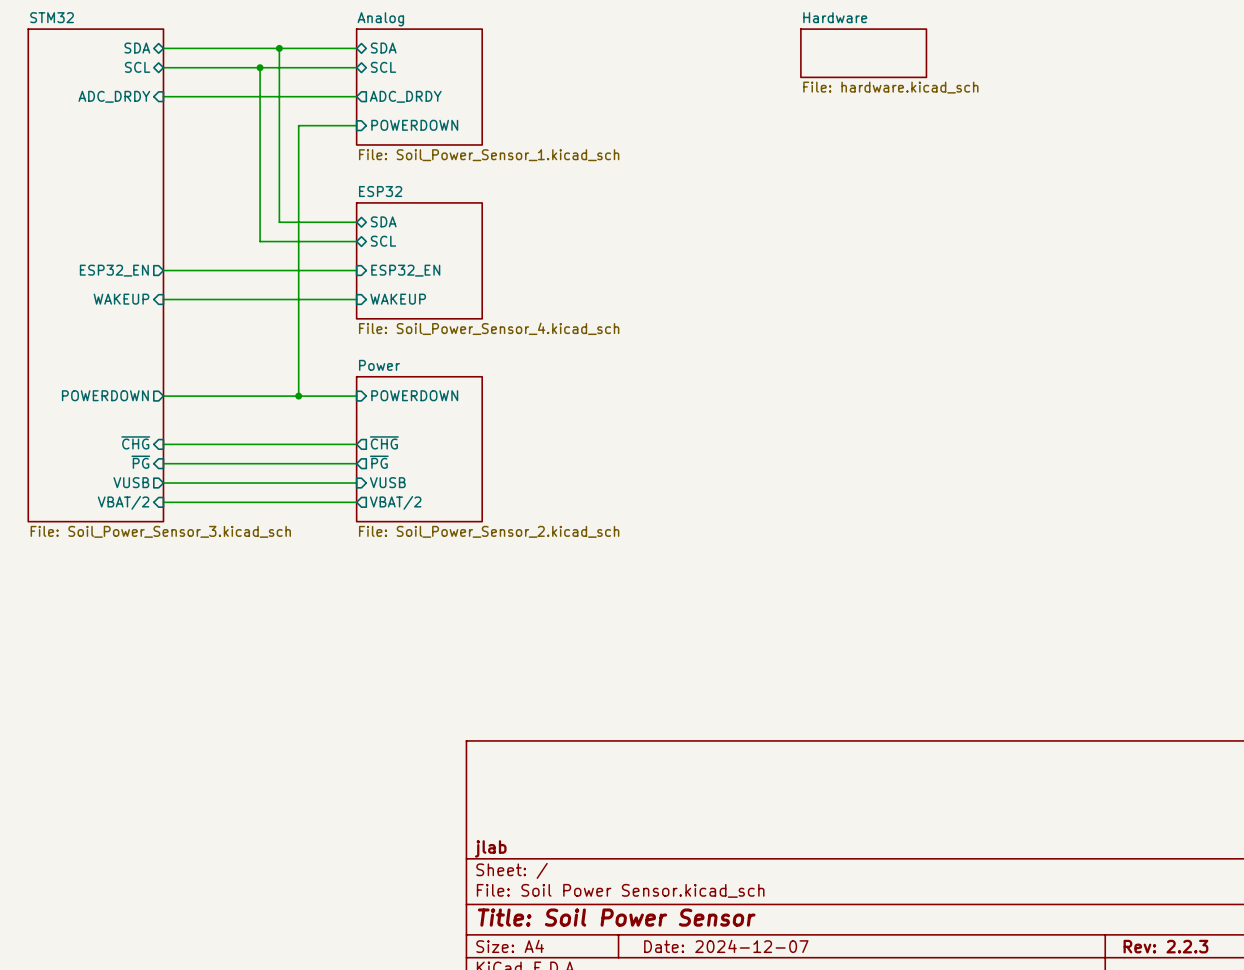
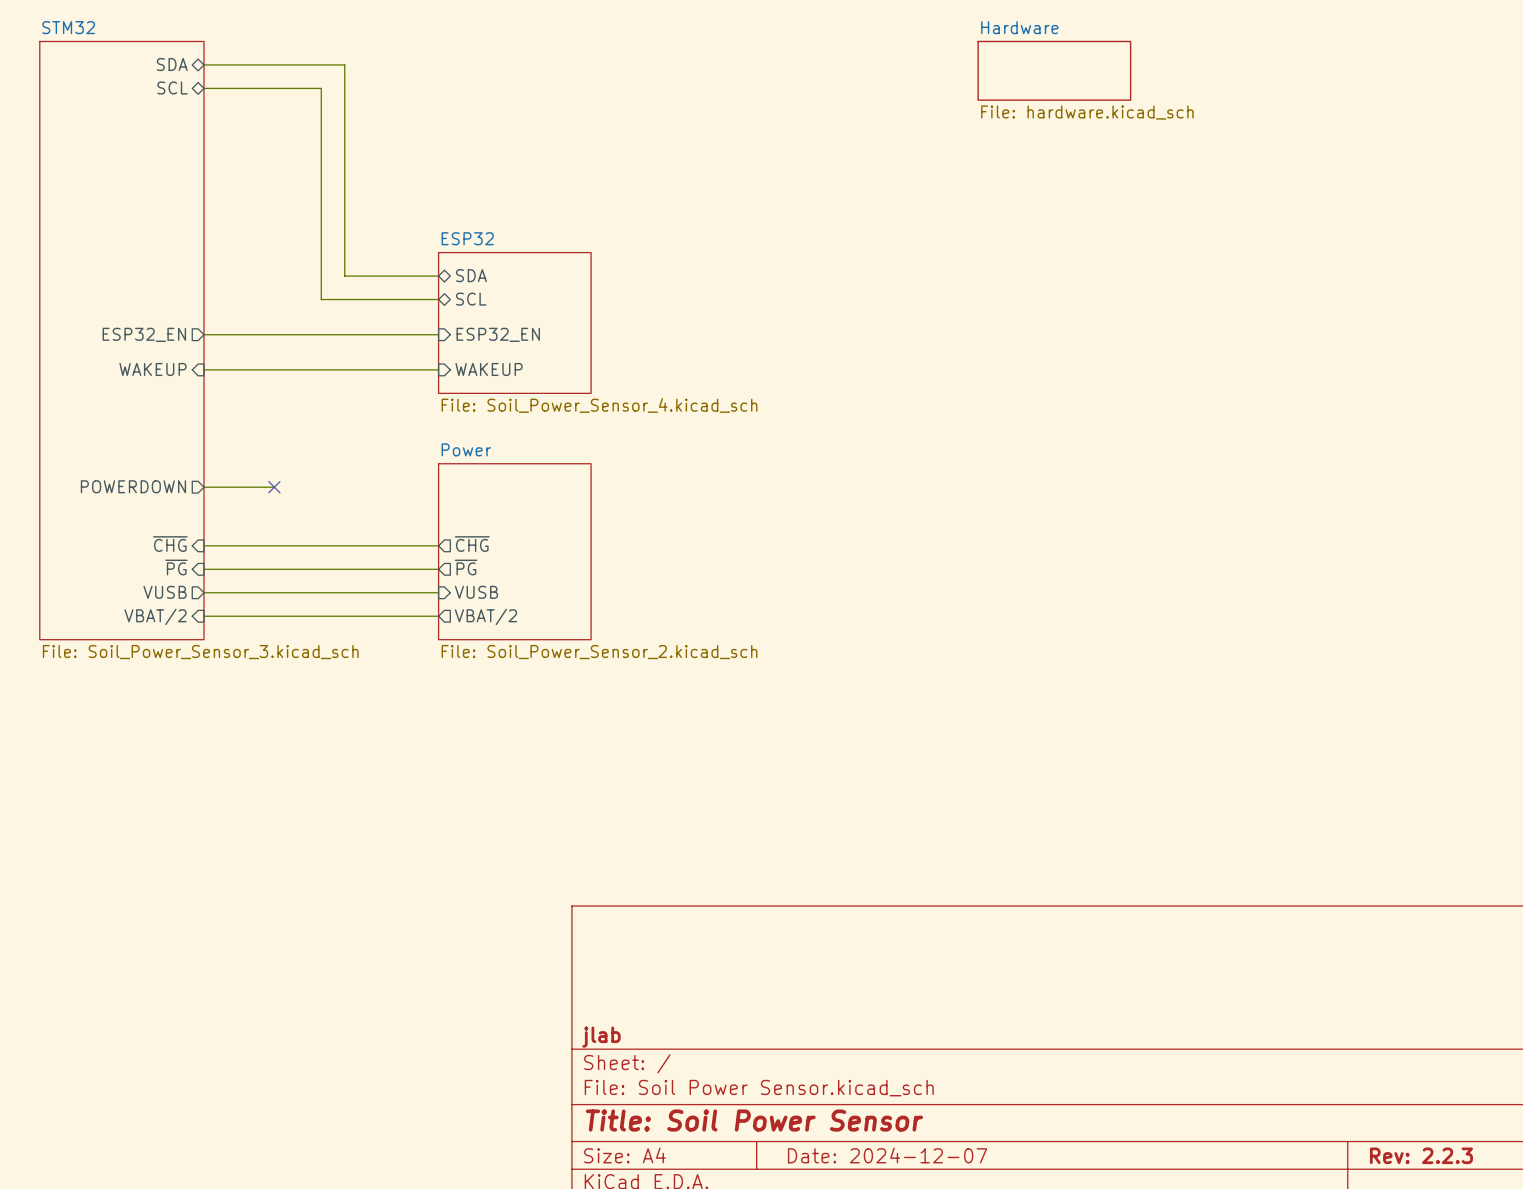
wire: (279, 48) (356, 48) -> none
junction: (279, 48) -> none
sheet pin: SDA (383, 48) -> none
wire: (260, 67) (356, 67) -> none
junction: (260, 67) -> none
sheet pin: SCL (383, 67) -> none
sheet Analog: File: Soil_Power_Sensor_1.kicad_sch (419, 87) -> none
sheet pin: ADC_DRDY (114, 96) -> none
wire: (163, 96) (356, 96) -> none
sheet pin: ADC_DRDY (405, 96) -> none
wire: (356, 125) (298, 125) (298, 396) -> none
sheet pin: POWERDOWN (414, 125) -> none
sheet pin: POWERDOWN (414, 395) -> none
wire: (221, 396) (356, 396) -> none
no-connect mark: none -> (274, 487)
junction: (298, 396) -> none

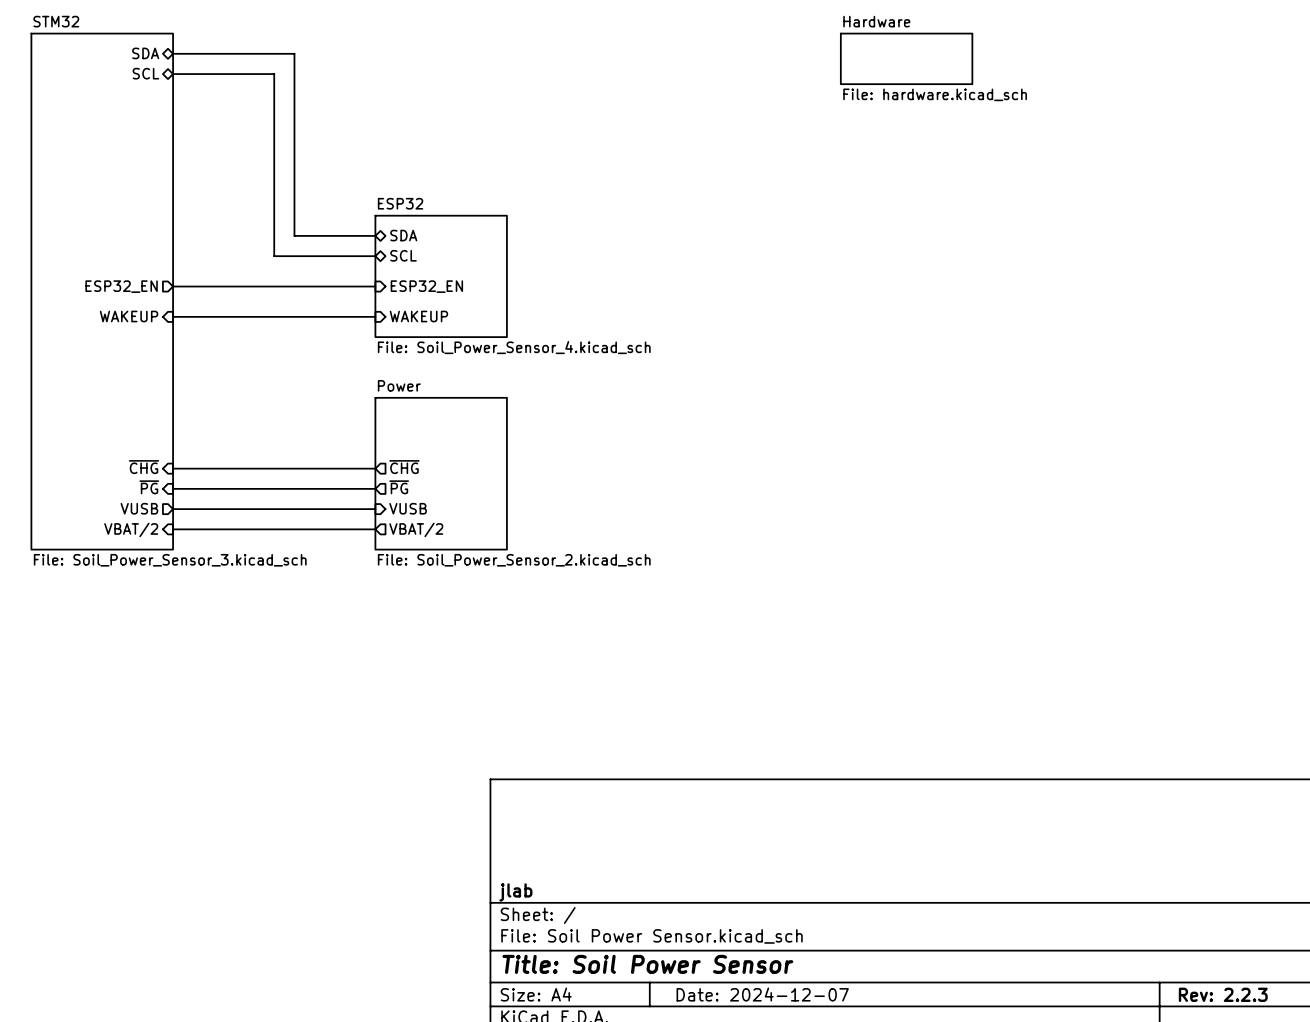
sheet pin: POWERDOWN (133, 486) -> none
wire: (204, 487) (274, 487) -> none
no-connect mark: (274, 487) -> none

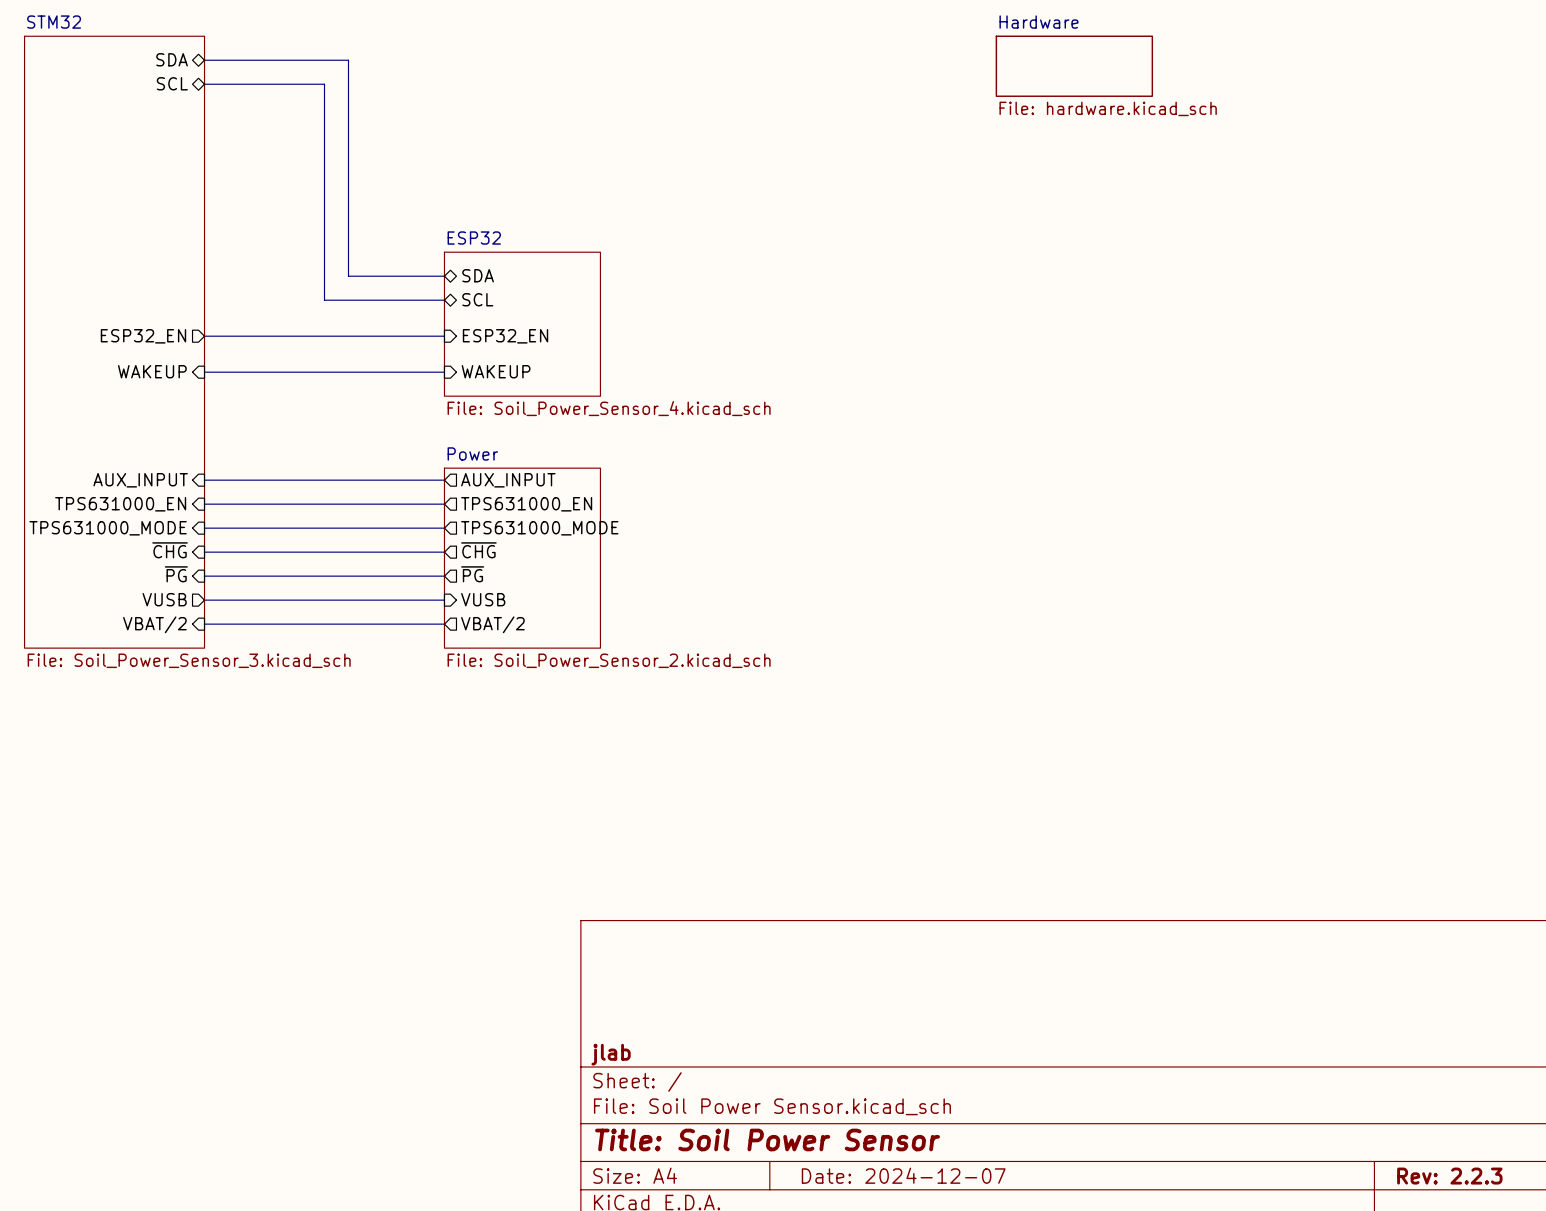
sheet STM32 shape: [31, 33, 174, 550] -> [24, 36, 205, 649]
wire: none -> (204, 480) (444, 480)
sheet pin: none -> AUX_INPUT (140, 480)
sheet pin: none -> AUX_INPUT (508, 480)
sheet pin: none -> TPS631000_EN (120, 504)
wire: none -> (204, 504) (444, 504)
sheet pin: none -> TPS631000_EN (526, 504)
sheet pin: none -> TPS631000_MODE (108, 528)
wire: none -> (204, 528) (444, 528)
sheet pin: none -> TPS631000_MODE (539, 528)

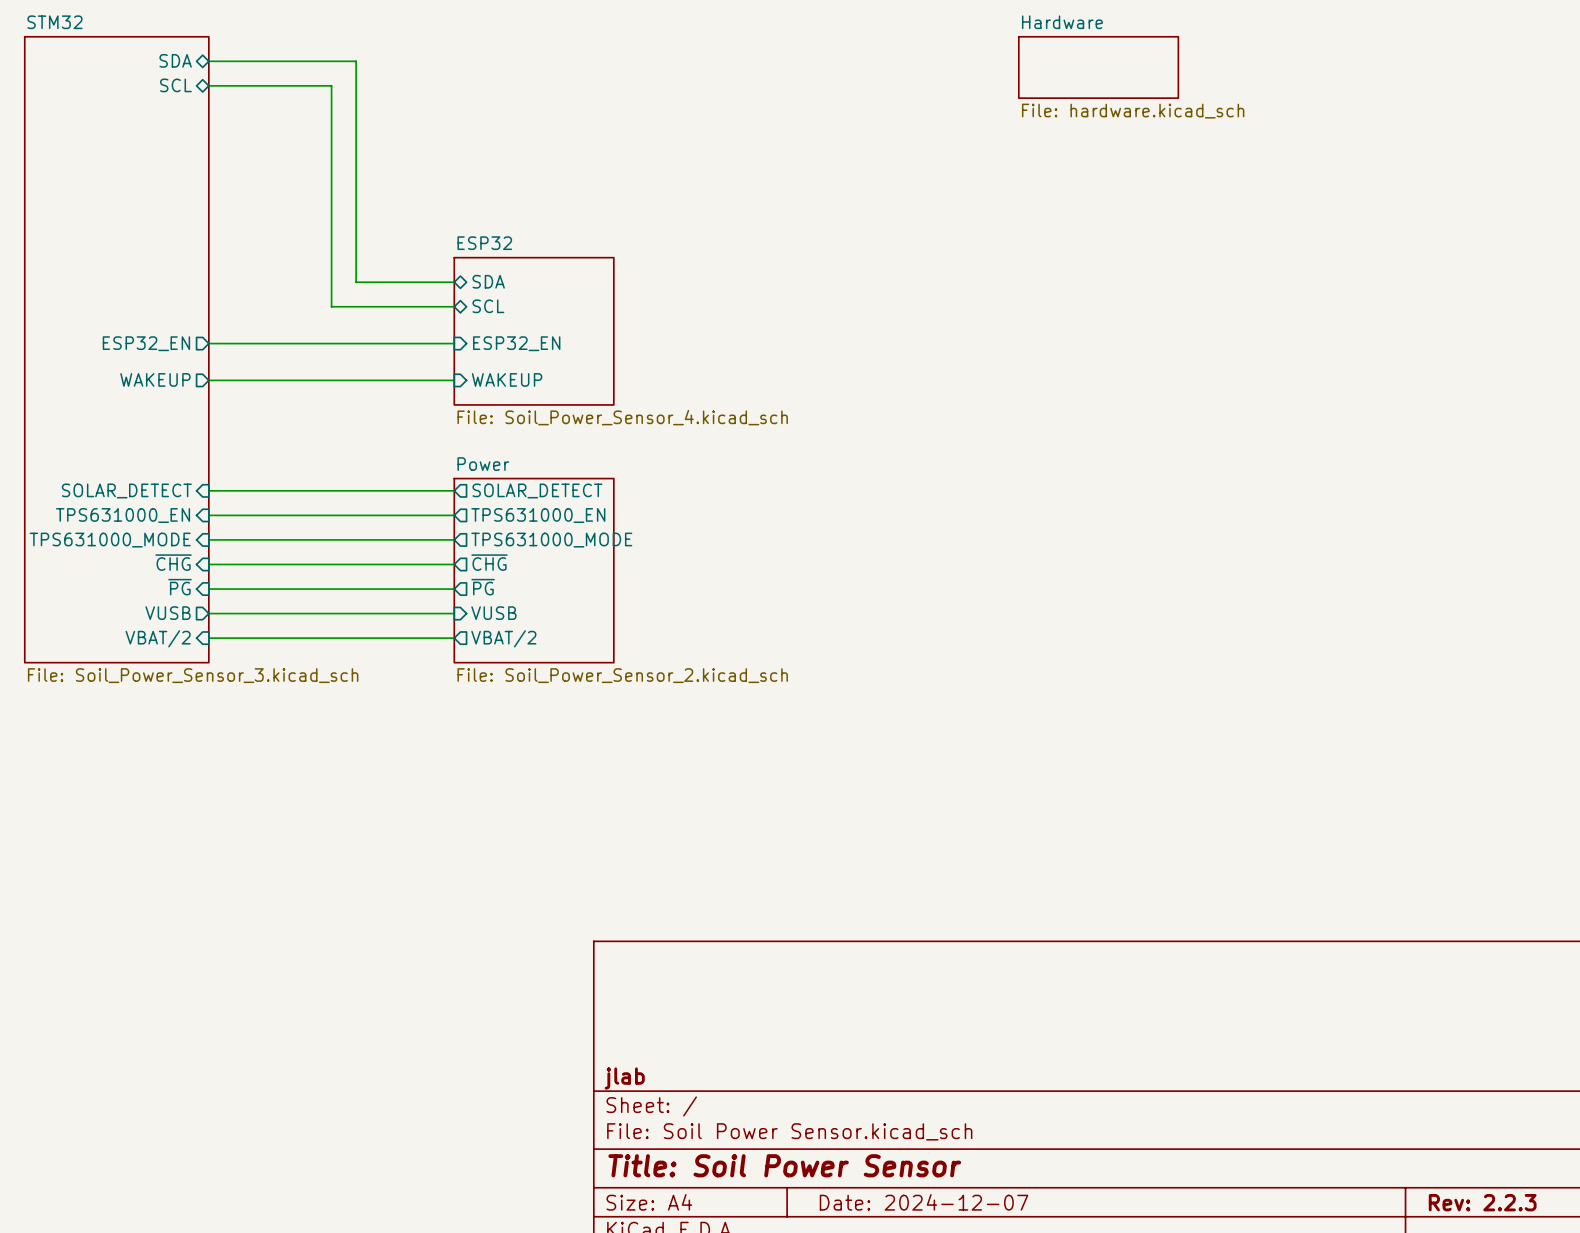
sheet pin shape: input (152, 371) -> output (155, 379)
sheet pin: AUX_INPUT (140, 480) -> SOLAR_DETECT (126, 490)
sheet pin: AUX_INPUT (508, 480) -> SOLAR_DETECT (537, 490)

